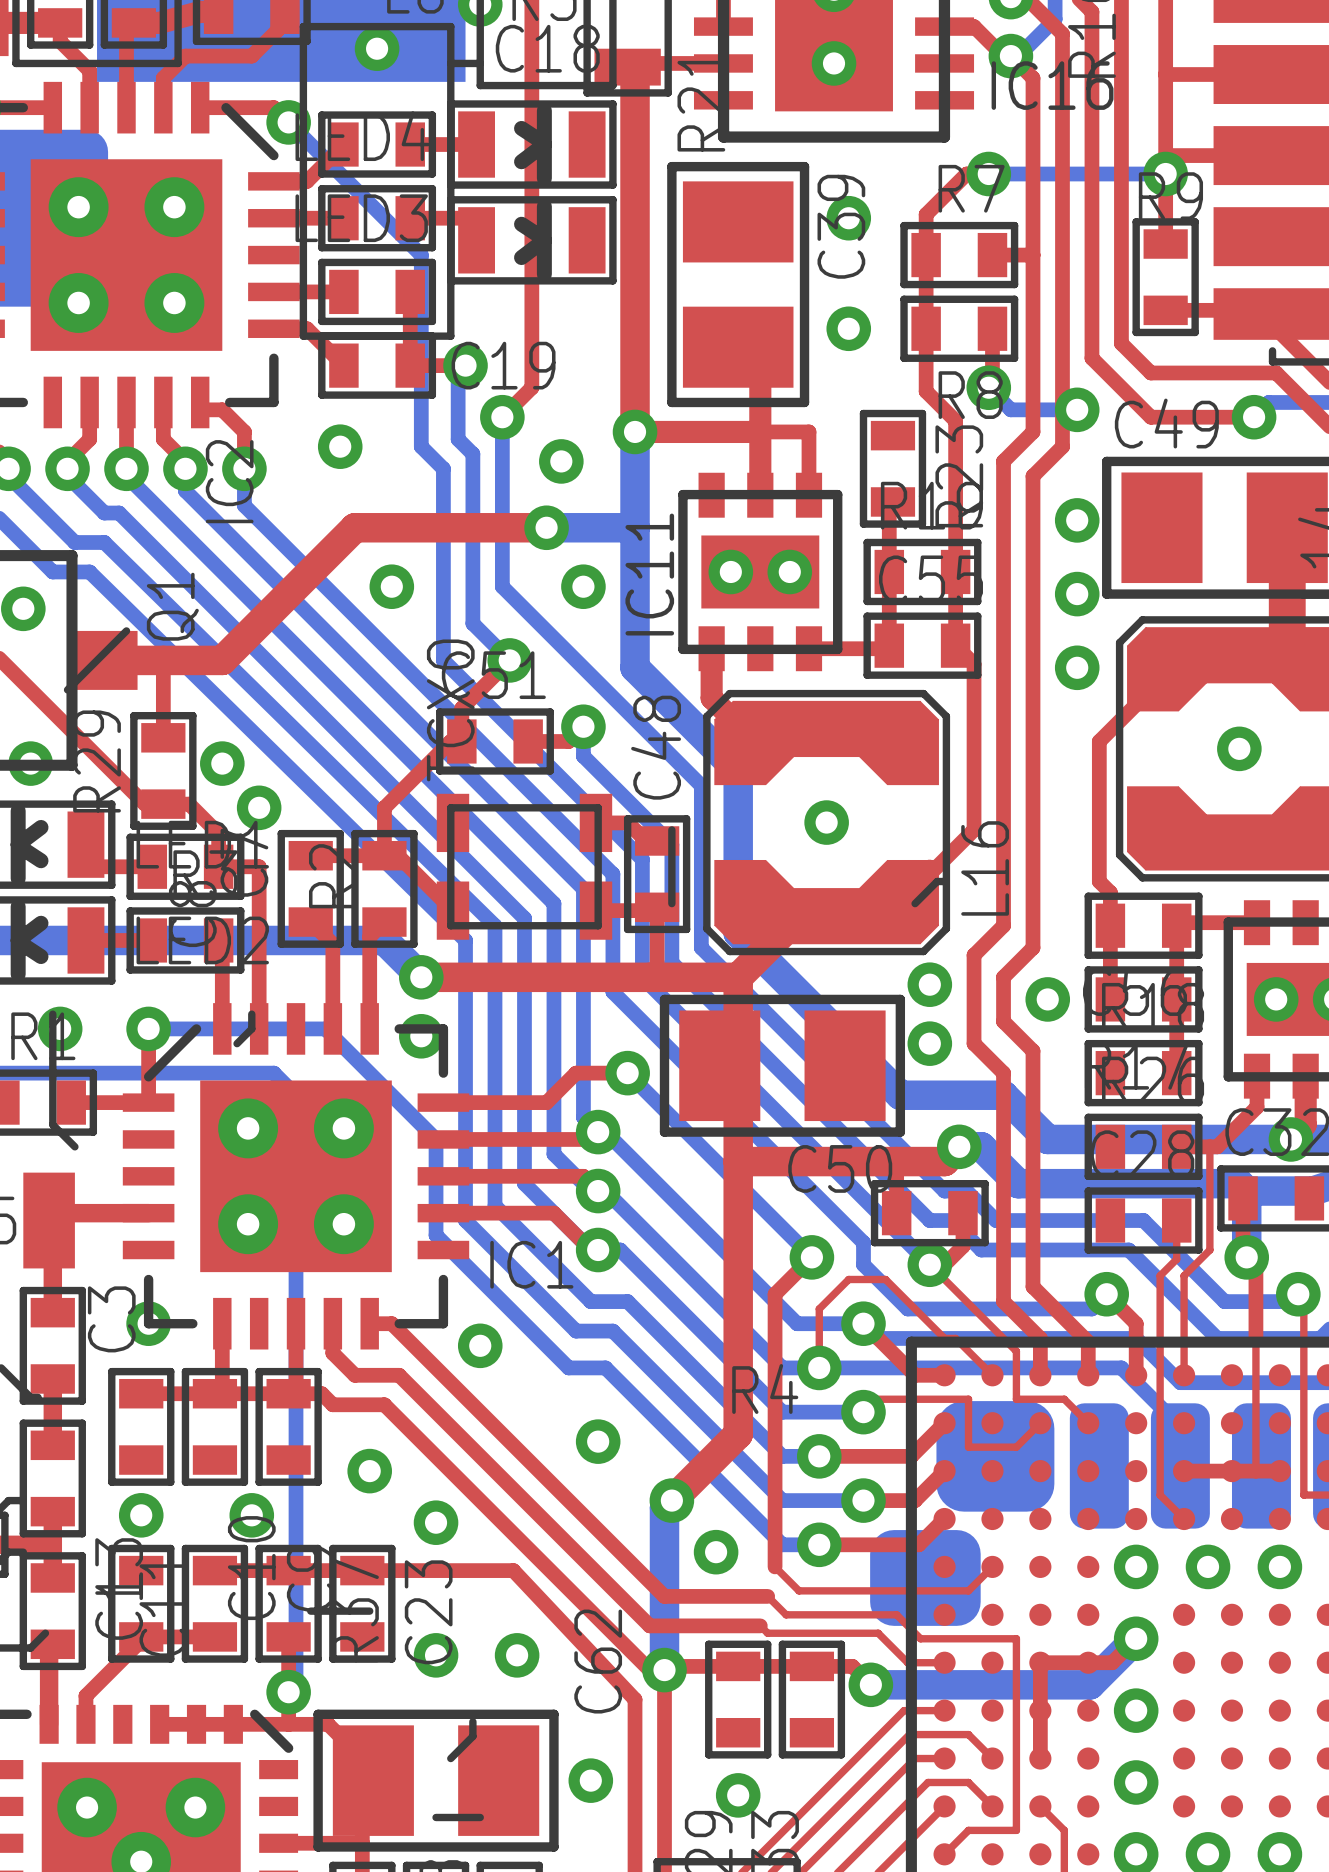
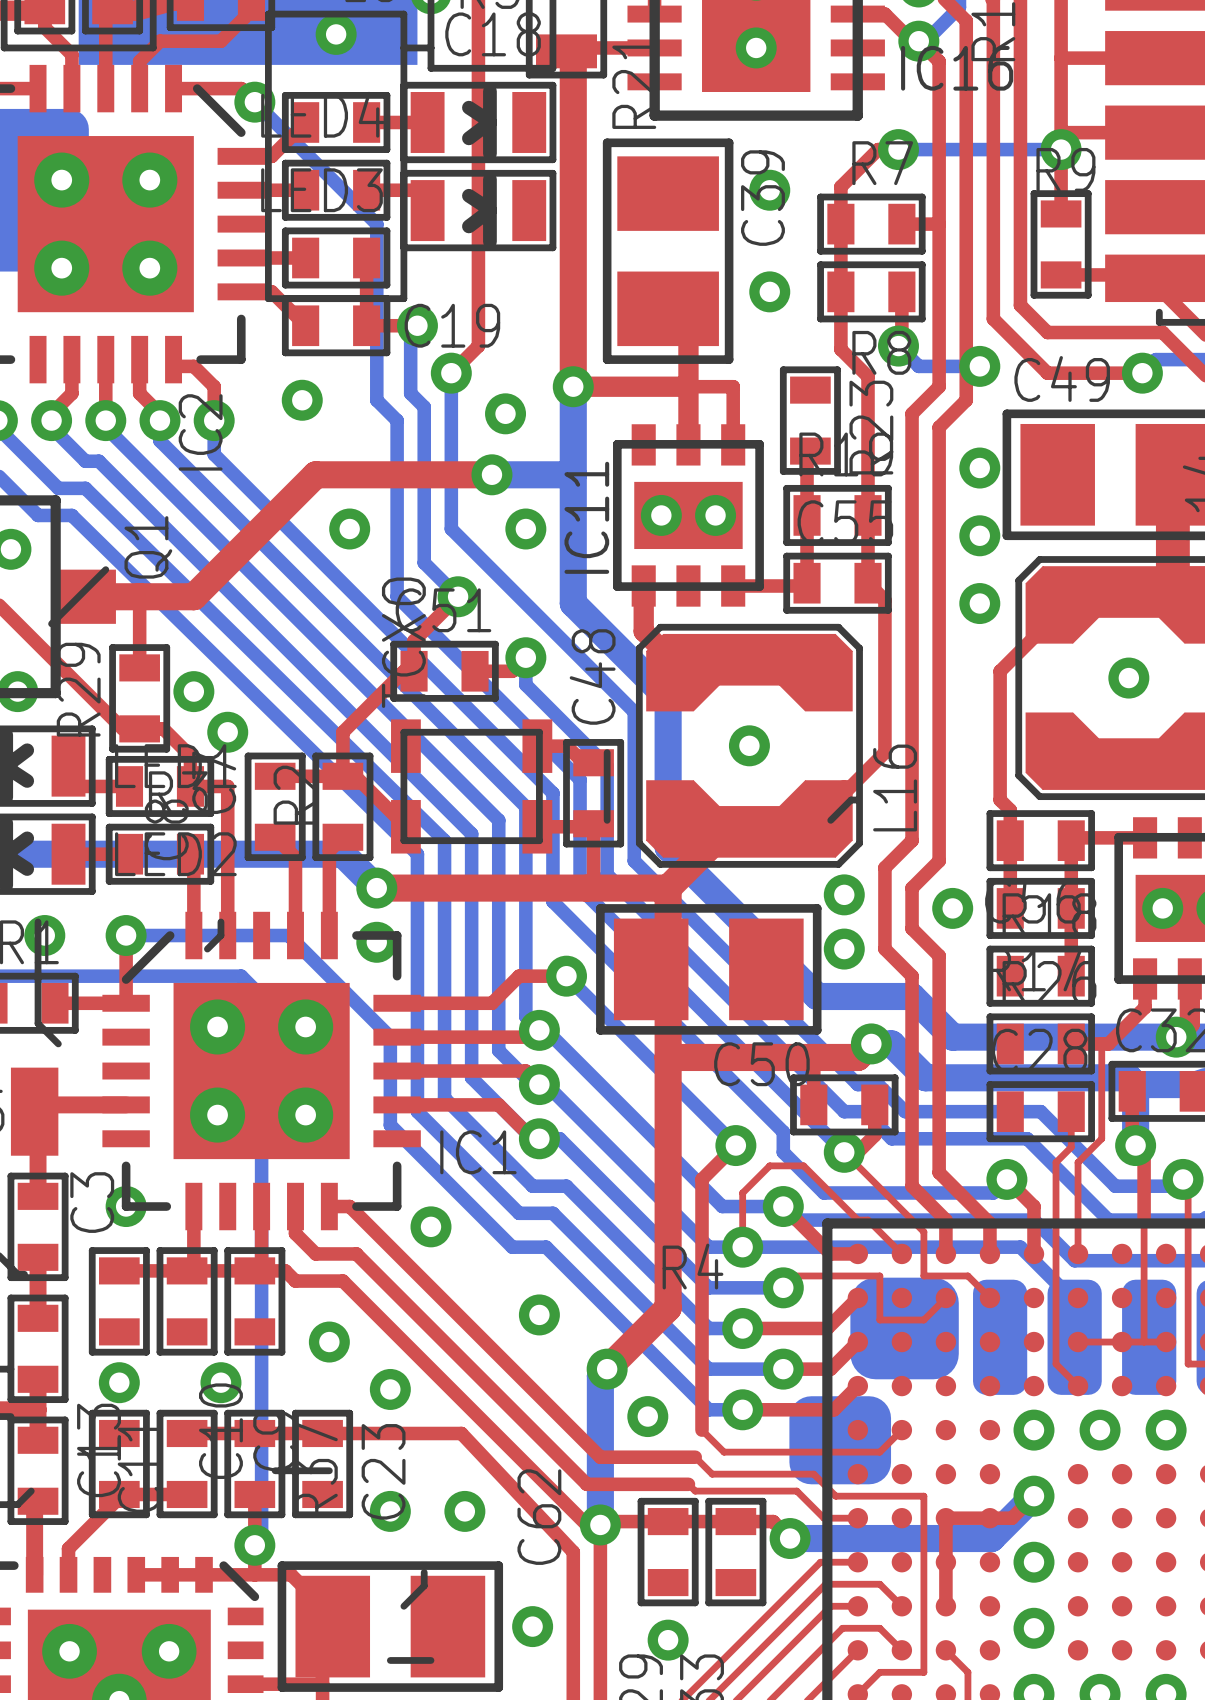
top track width: thick (1184, 1471) (1279, 1471) -> thin (1078, 1342) (1166, 1342)

